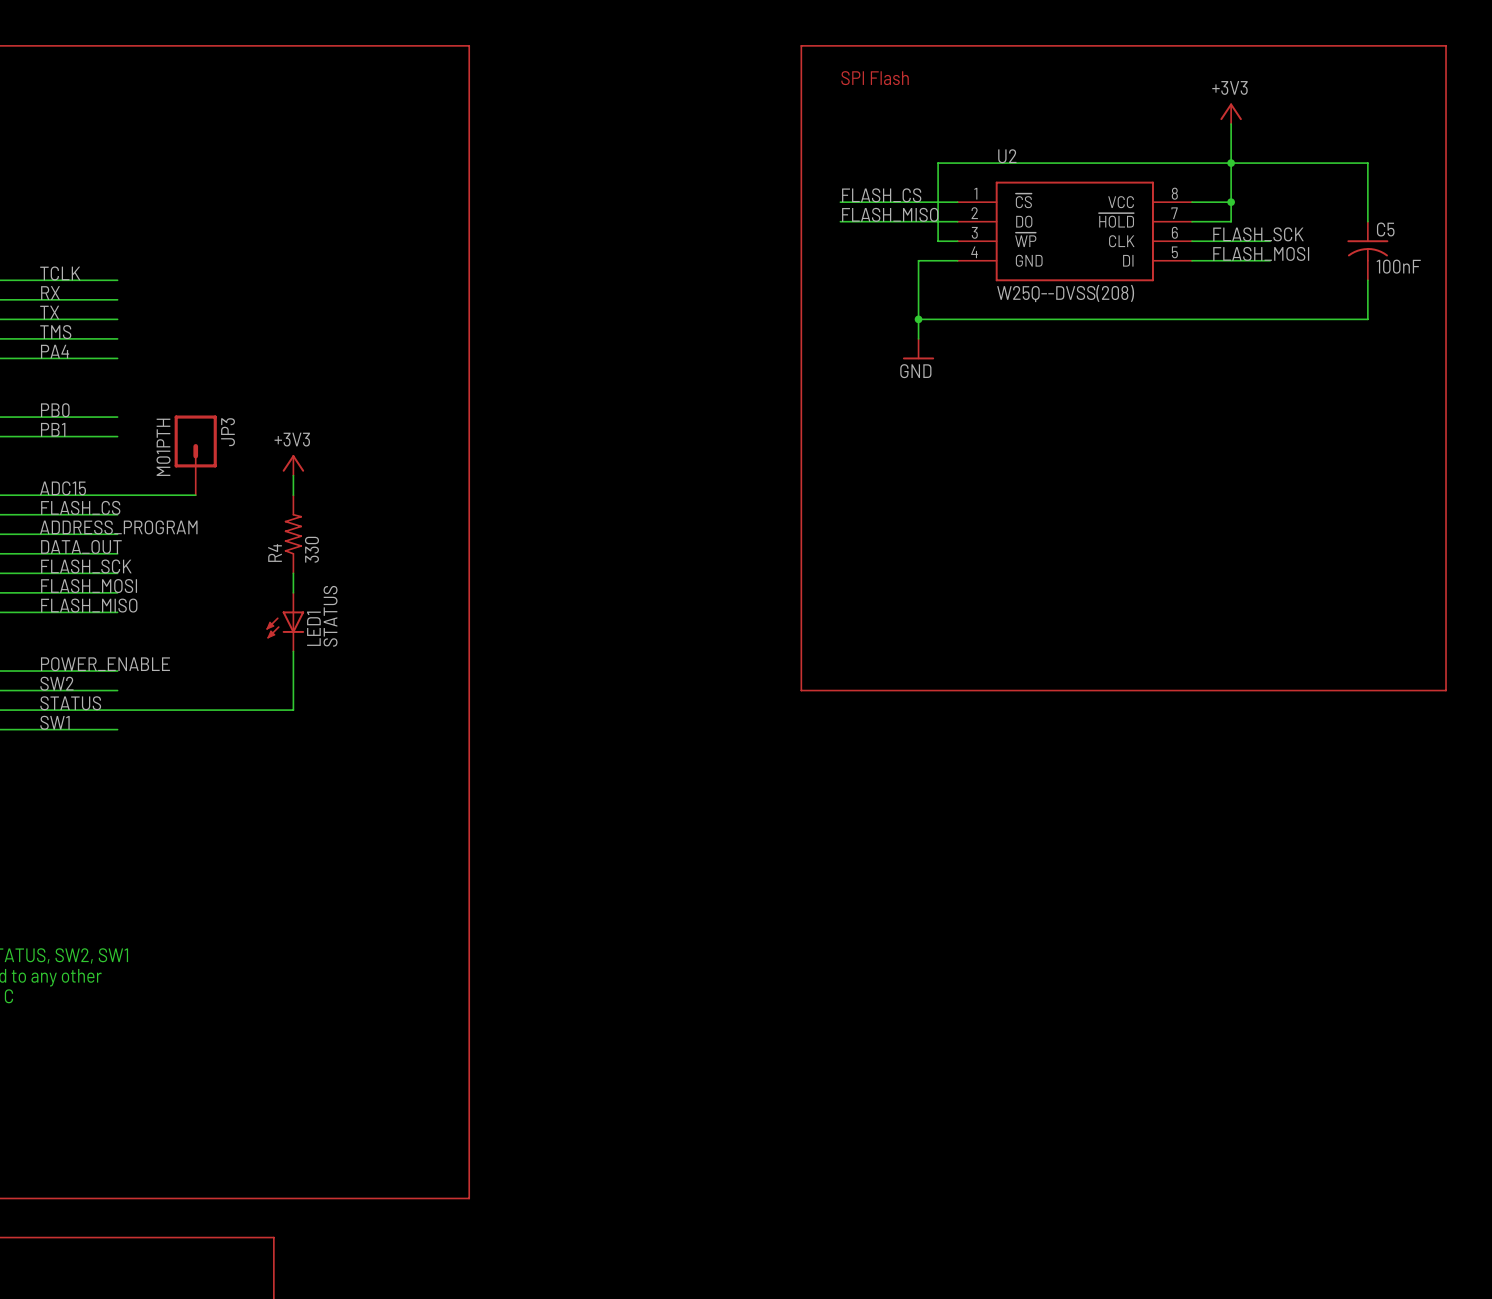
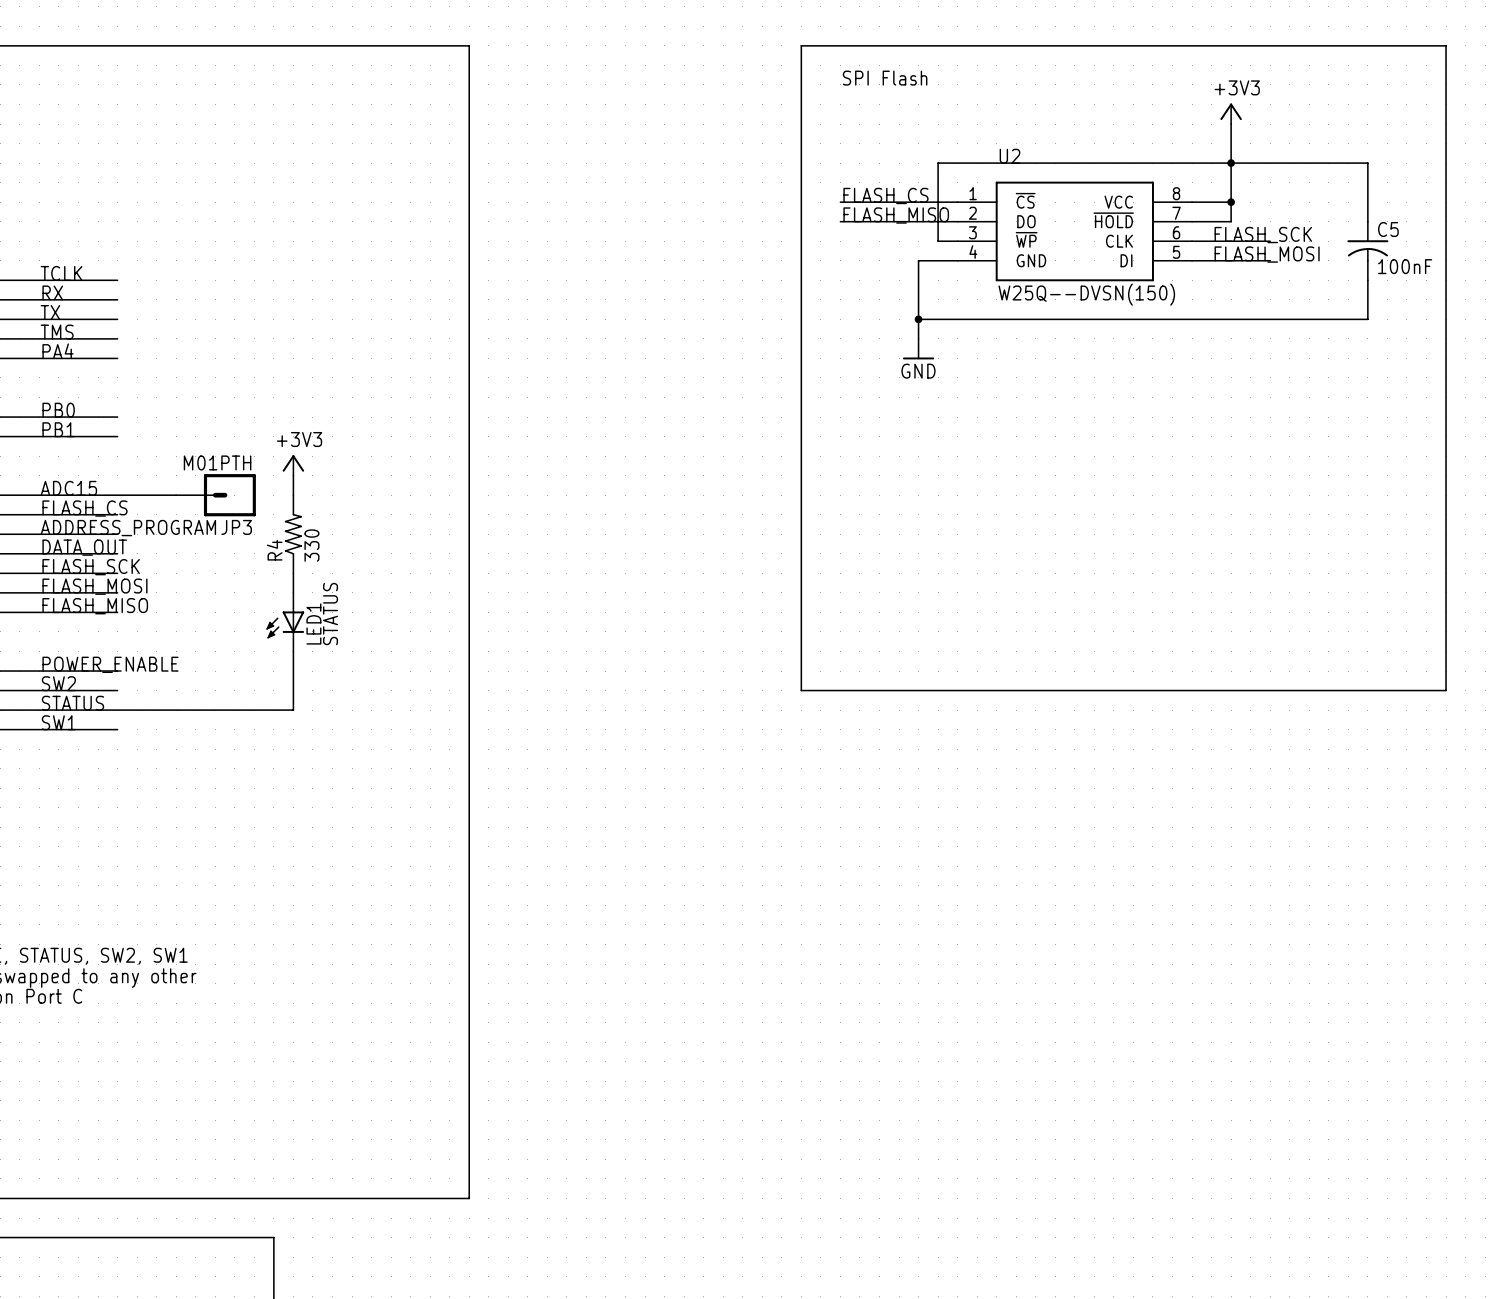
U2 value: W25Q--DVSS(208) (1065, 293) -> W25Q--DVSN(150) (1086, 294)
JP3 rotation: 0° (195, 441) -> 90° clockwise (229, 495)

